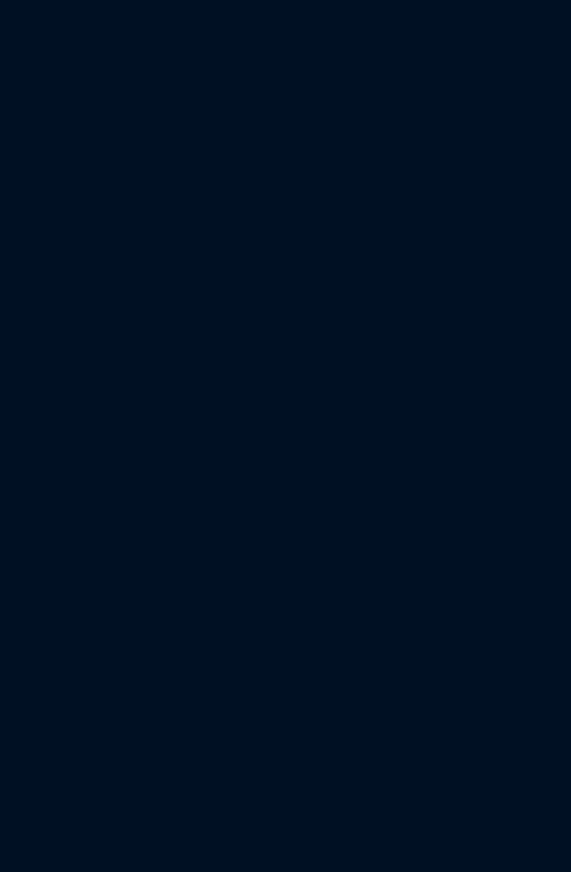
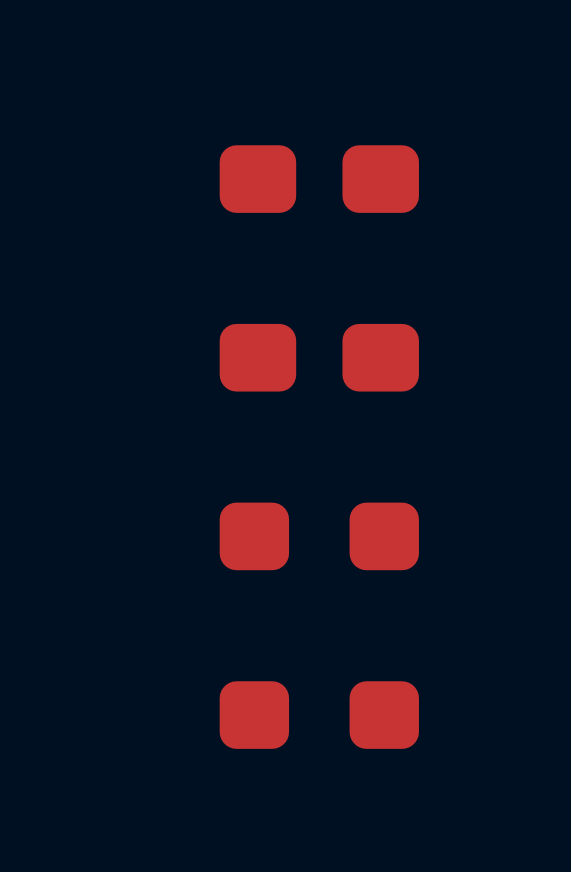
part: none -> (319, 179)
part: none -> (319, 357)
part: none -> (319, 536)
part: none -> (319, 715)

